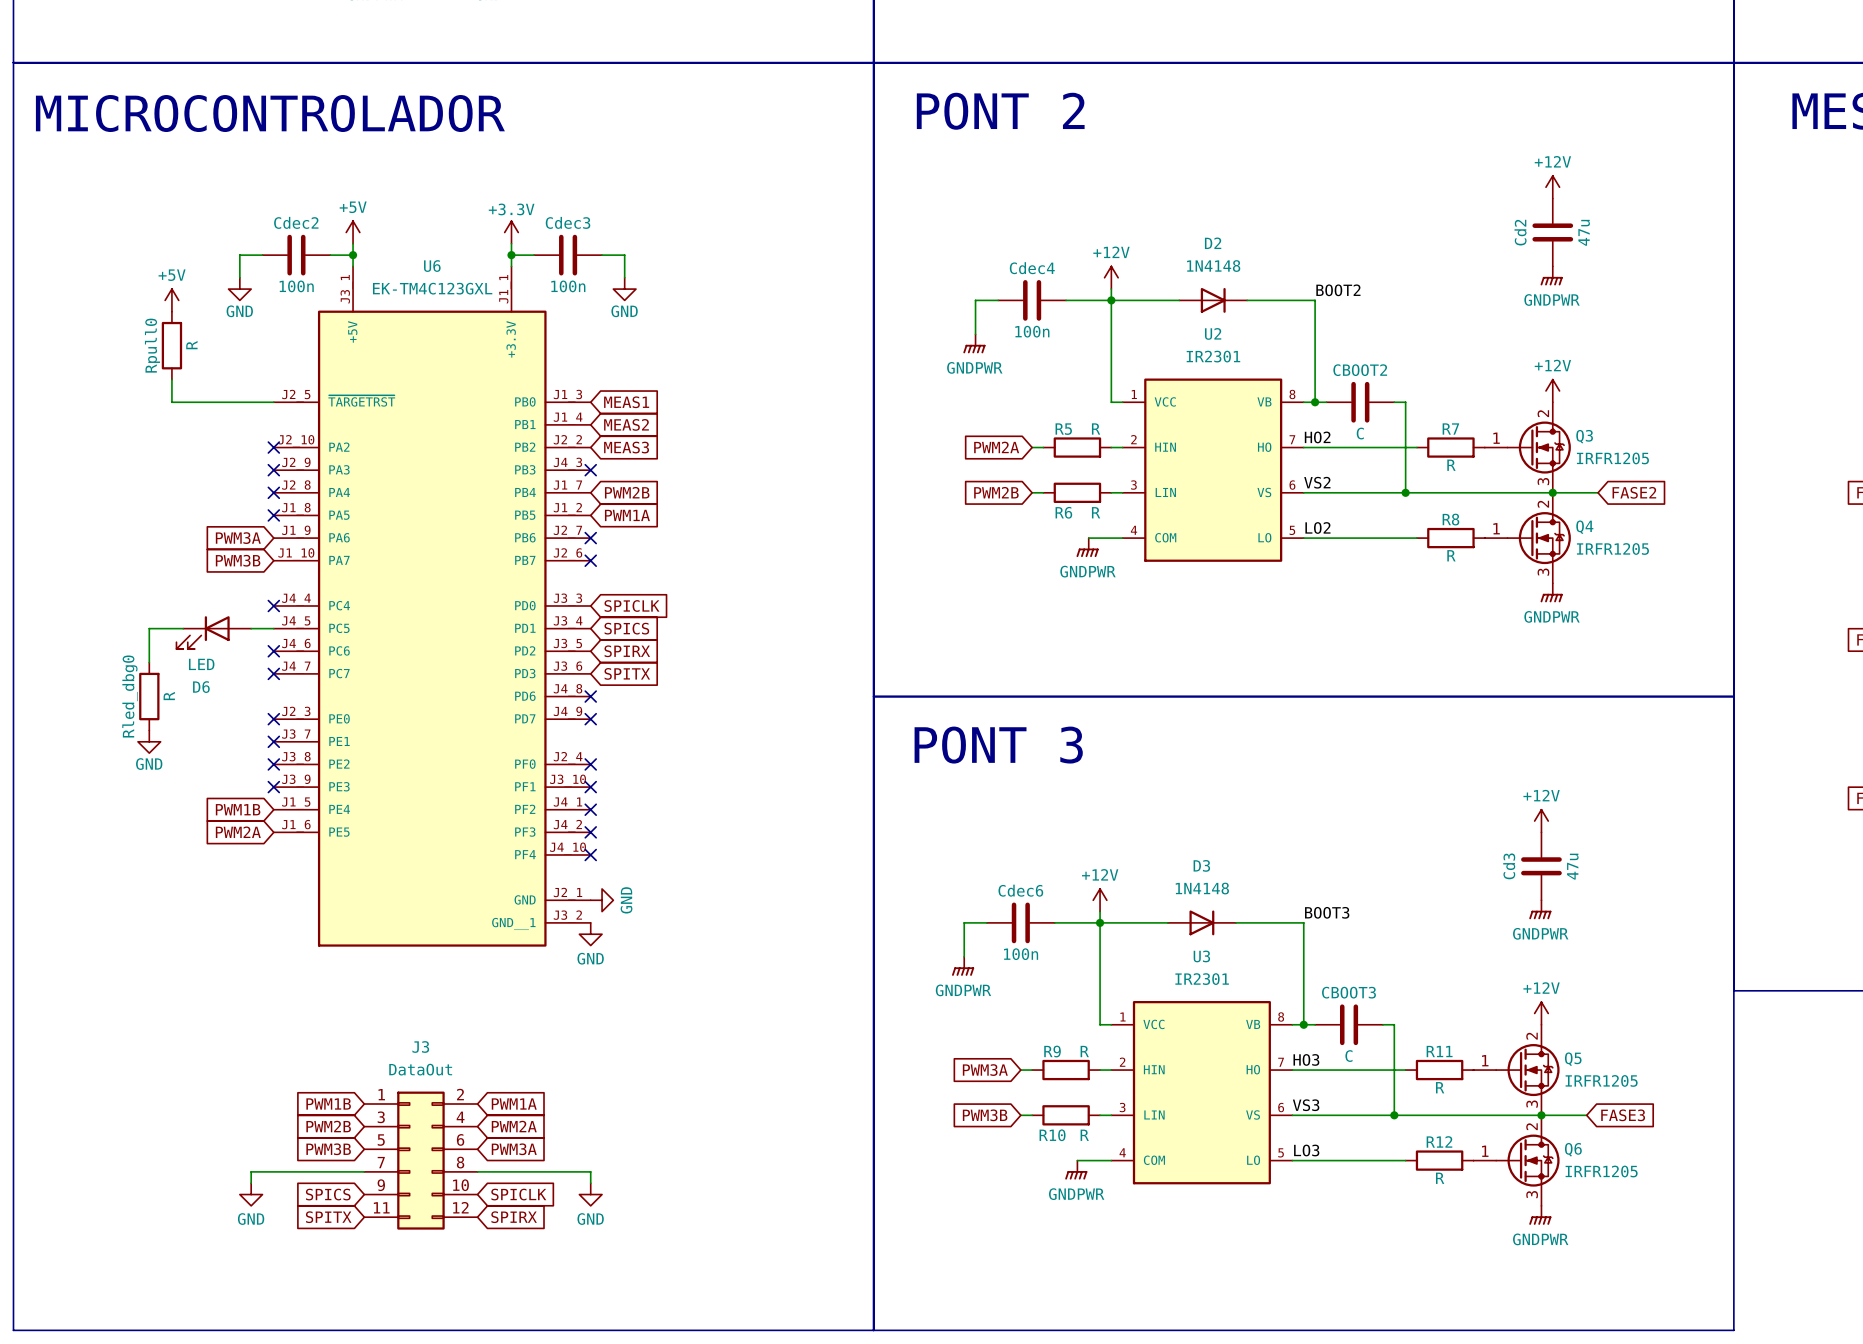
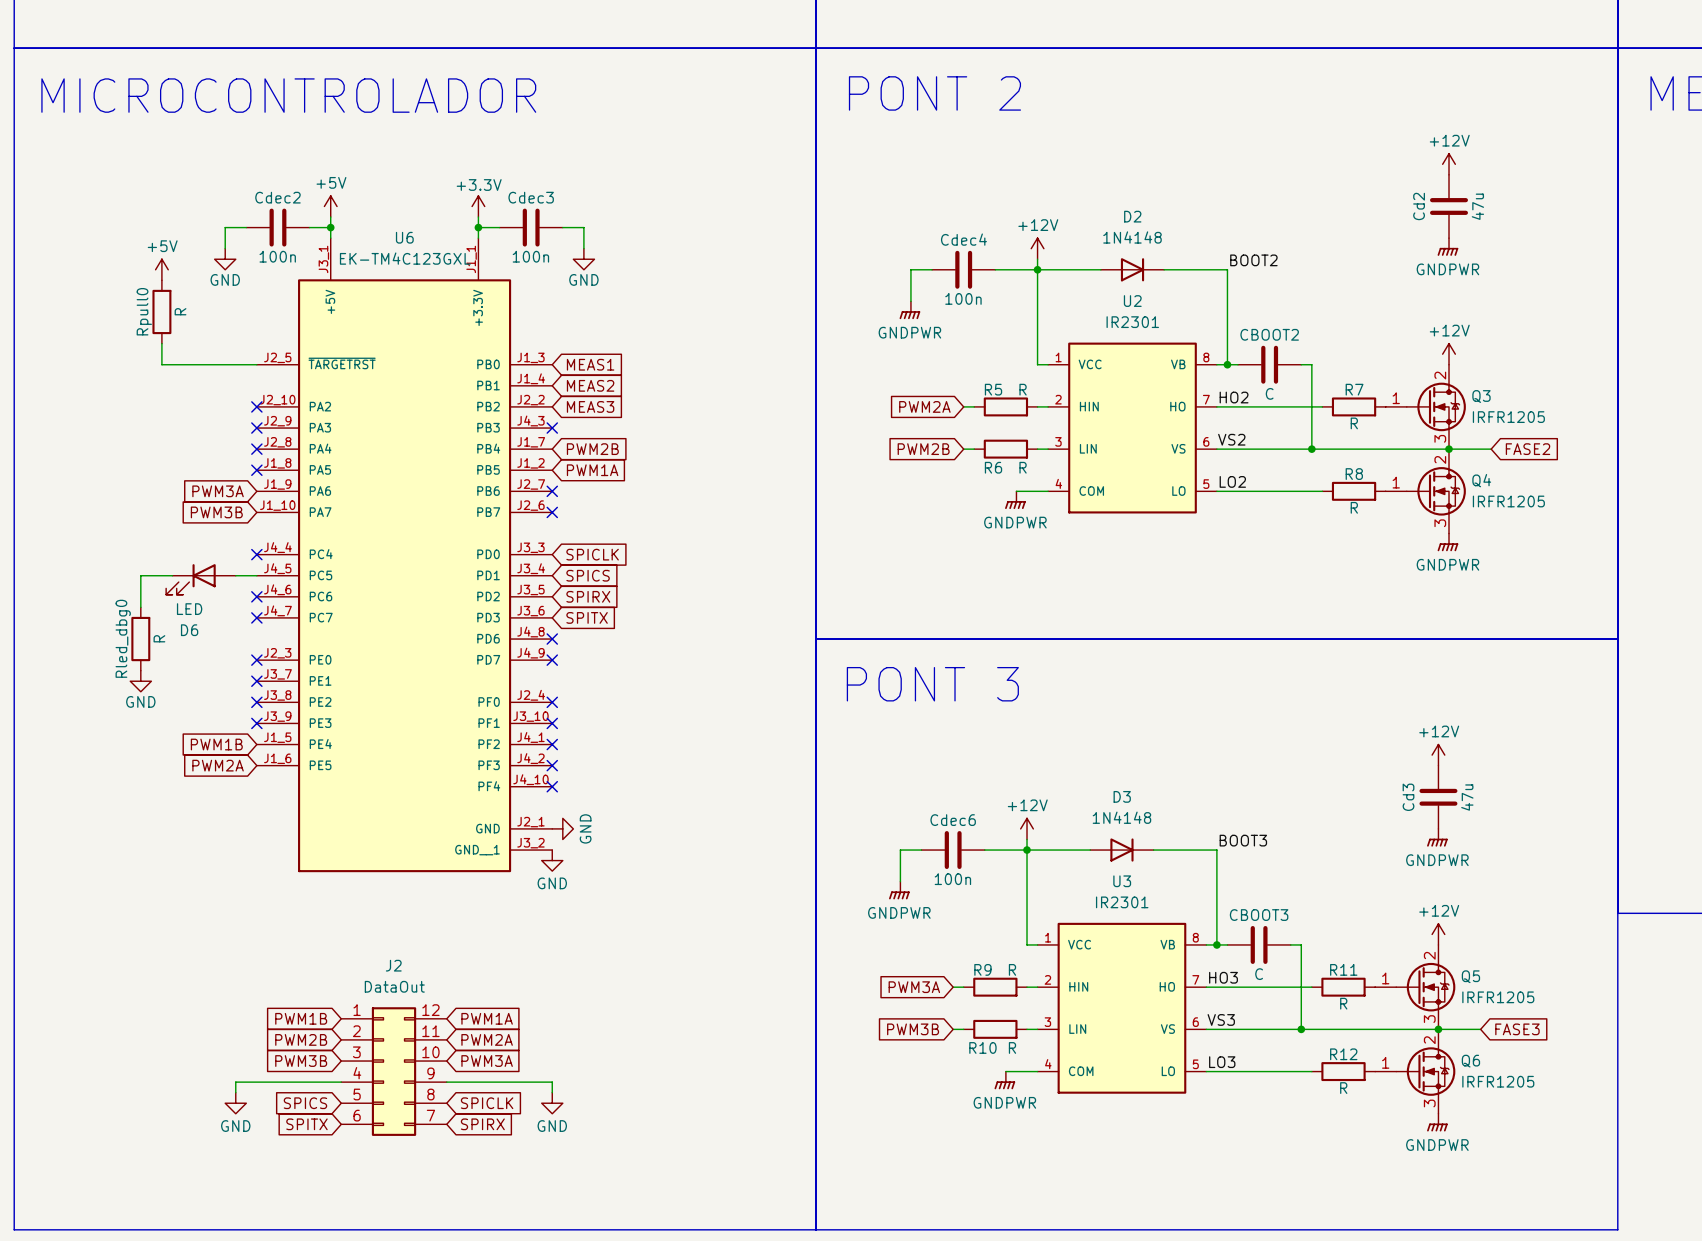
J3 name: J3 (420, 1046) -> J2 (393, 965)
J3 symbol: [364, 1091, 478, 1230] -> [341, 1007, 447, 1136]

